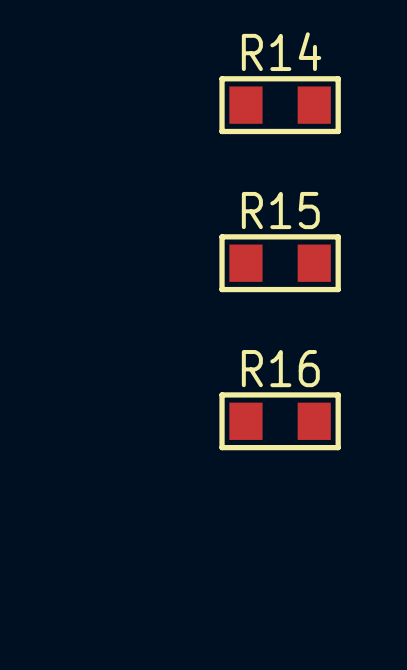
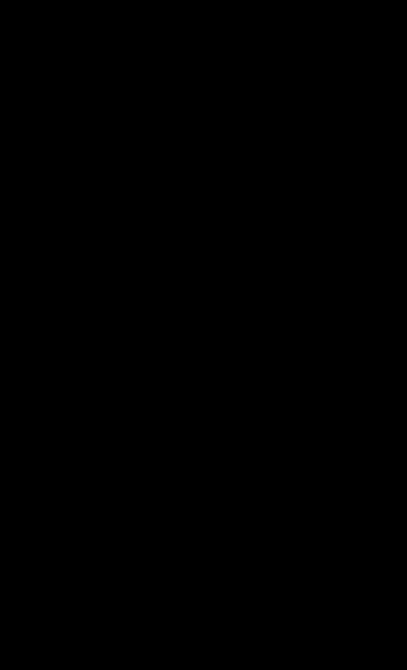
R14: (280, 105) -> none
R15: (280, 263) -> none
R16: (280, 421) -> none

